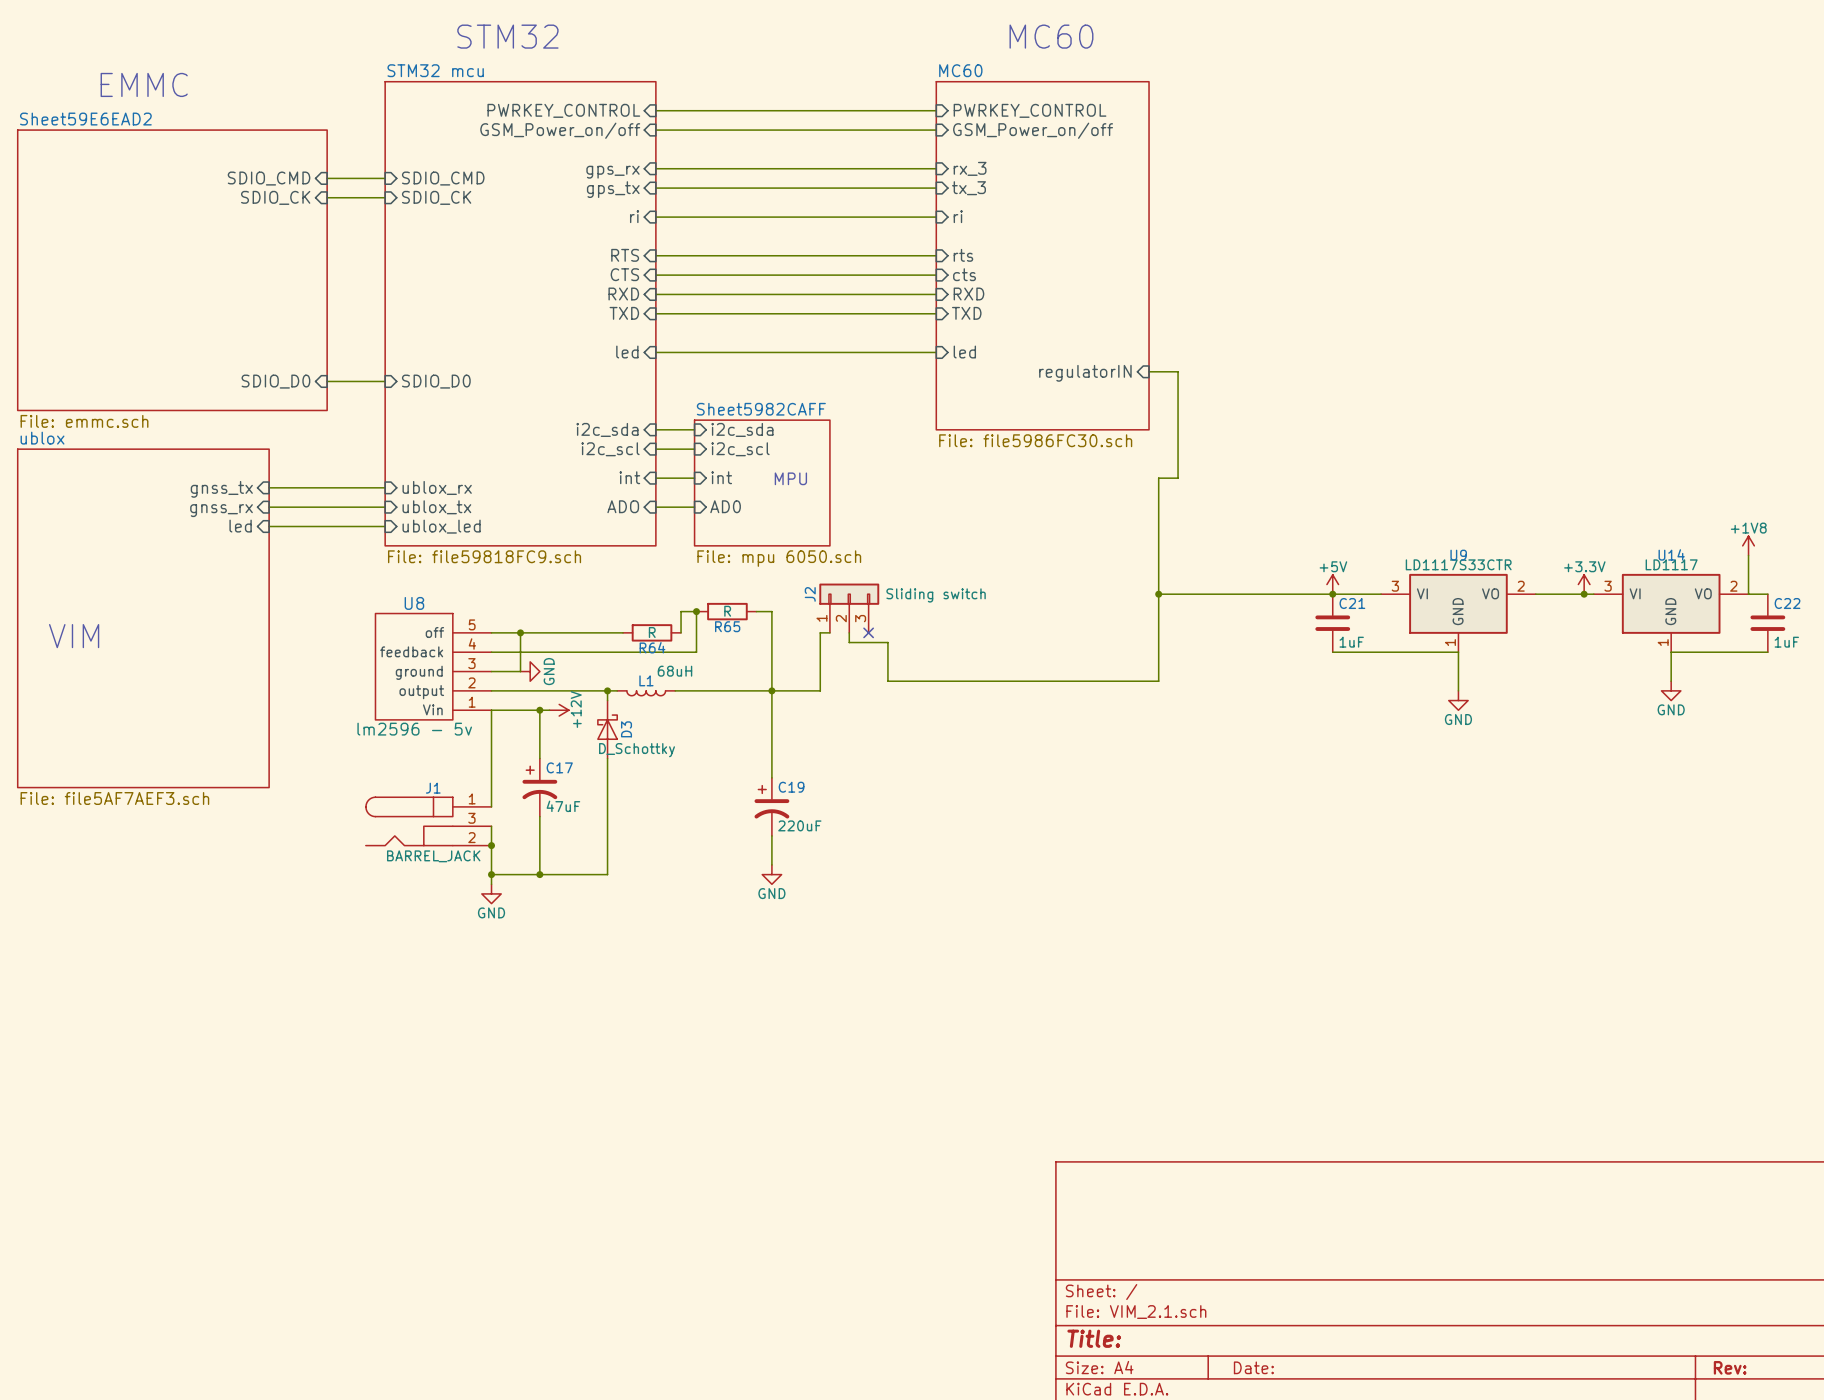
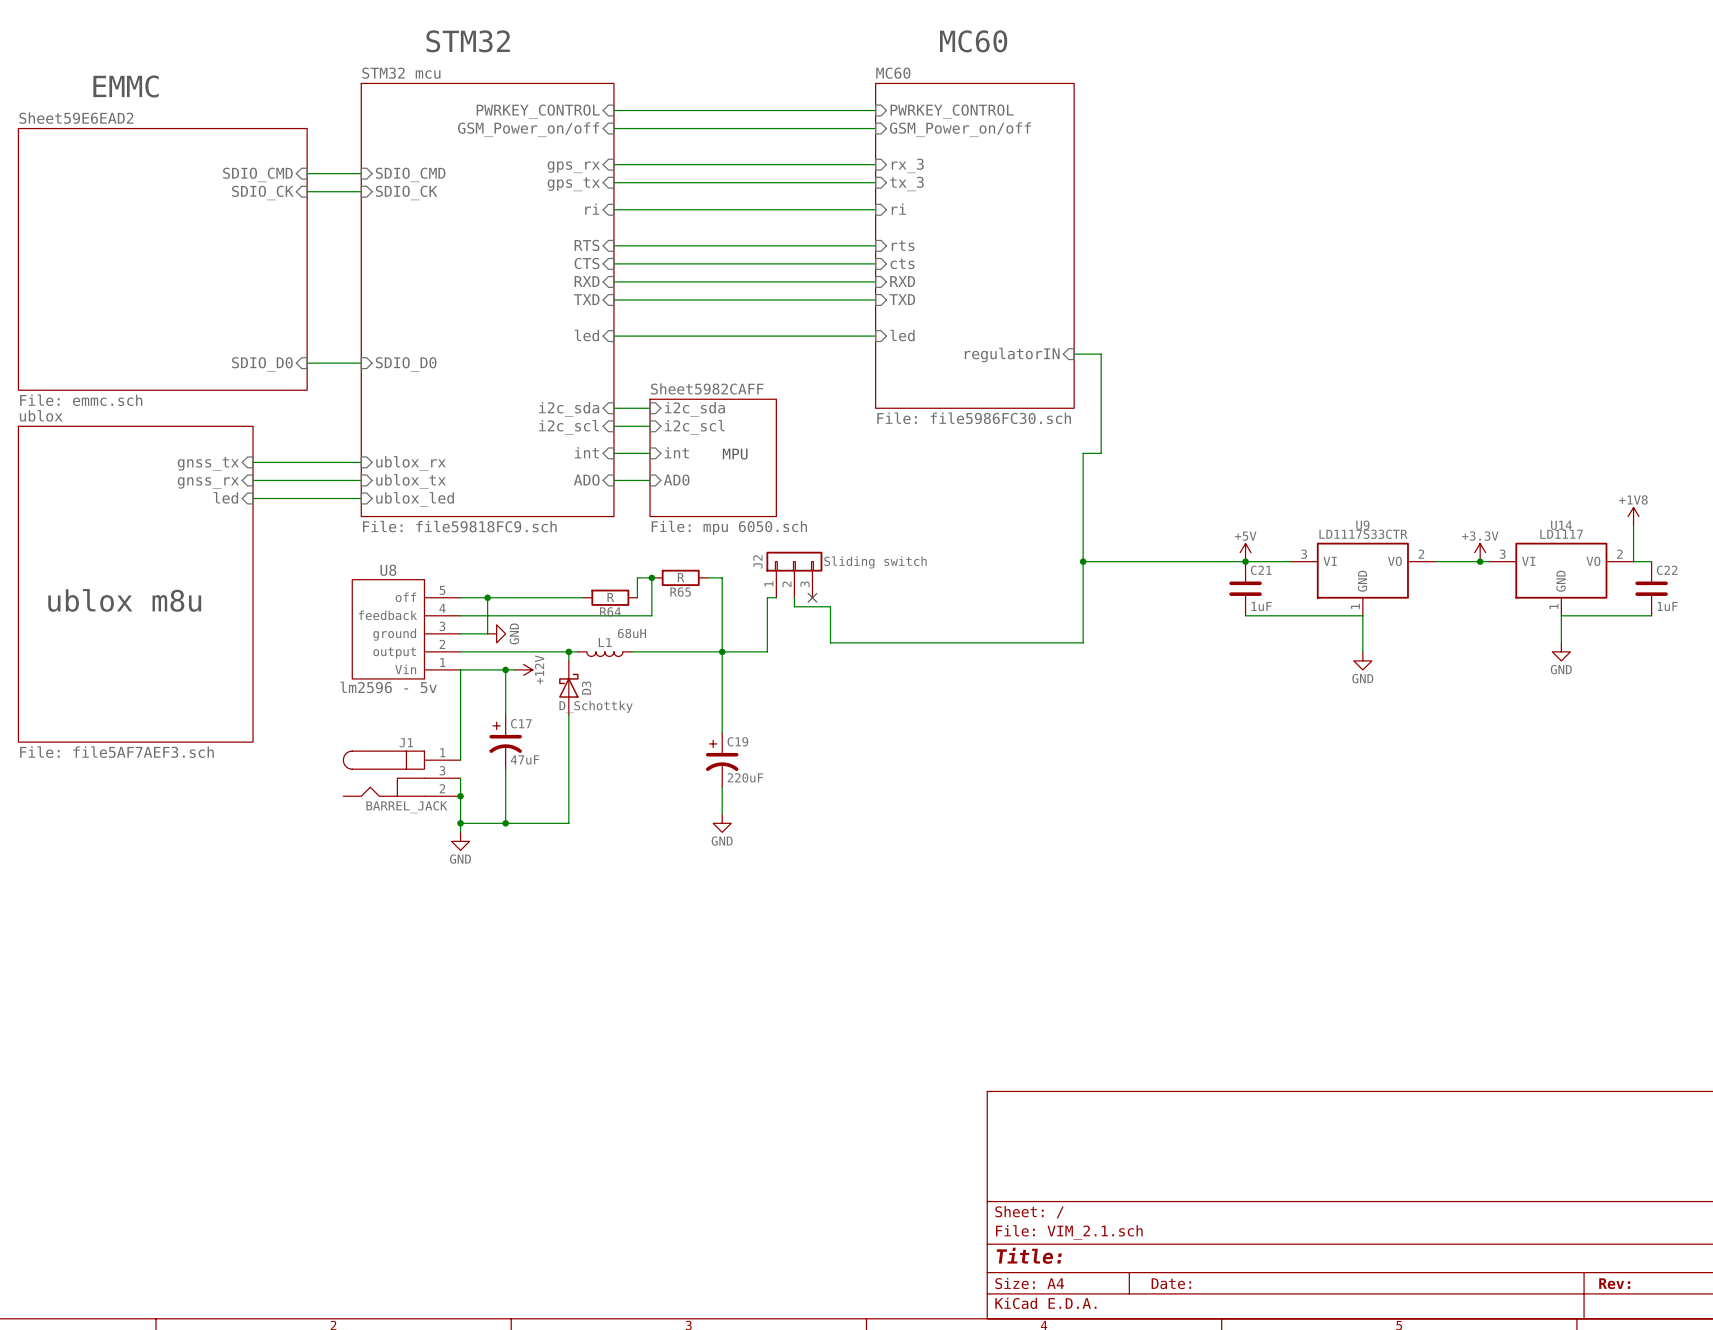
text: VIM (74, 636) -> ublox m8u (124, 600)

